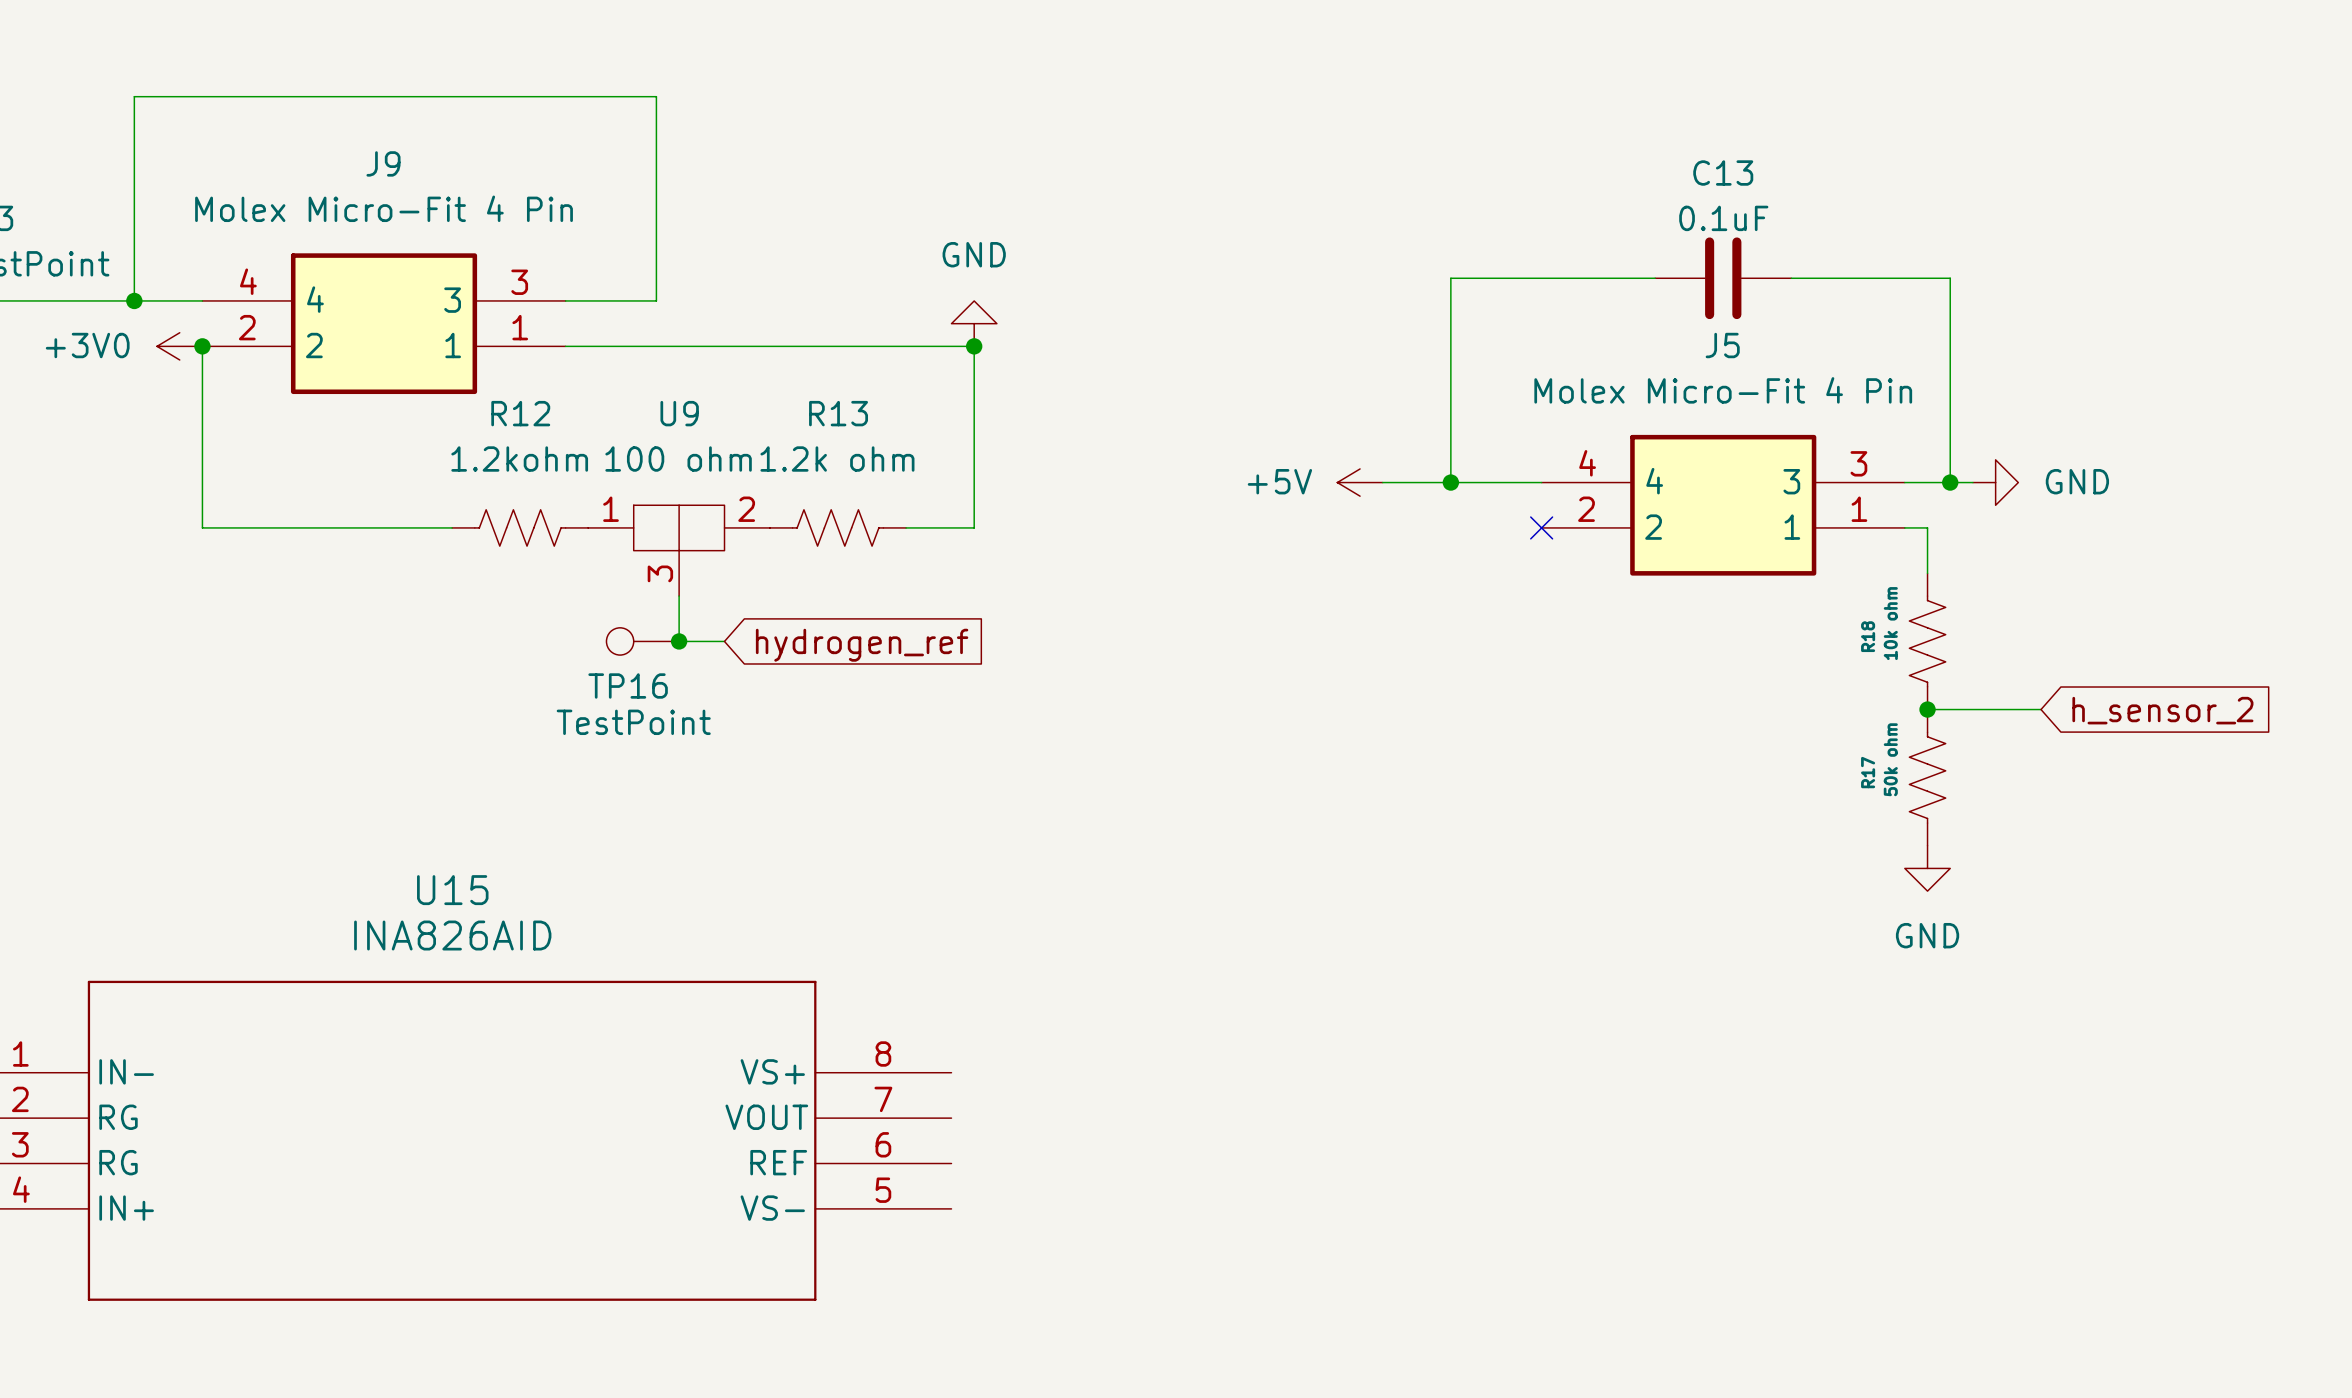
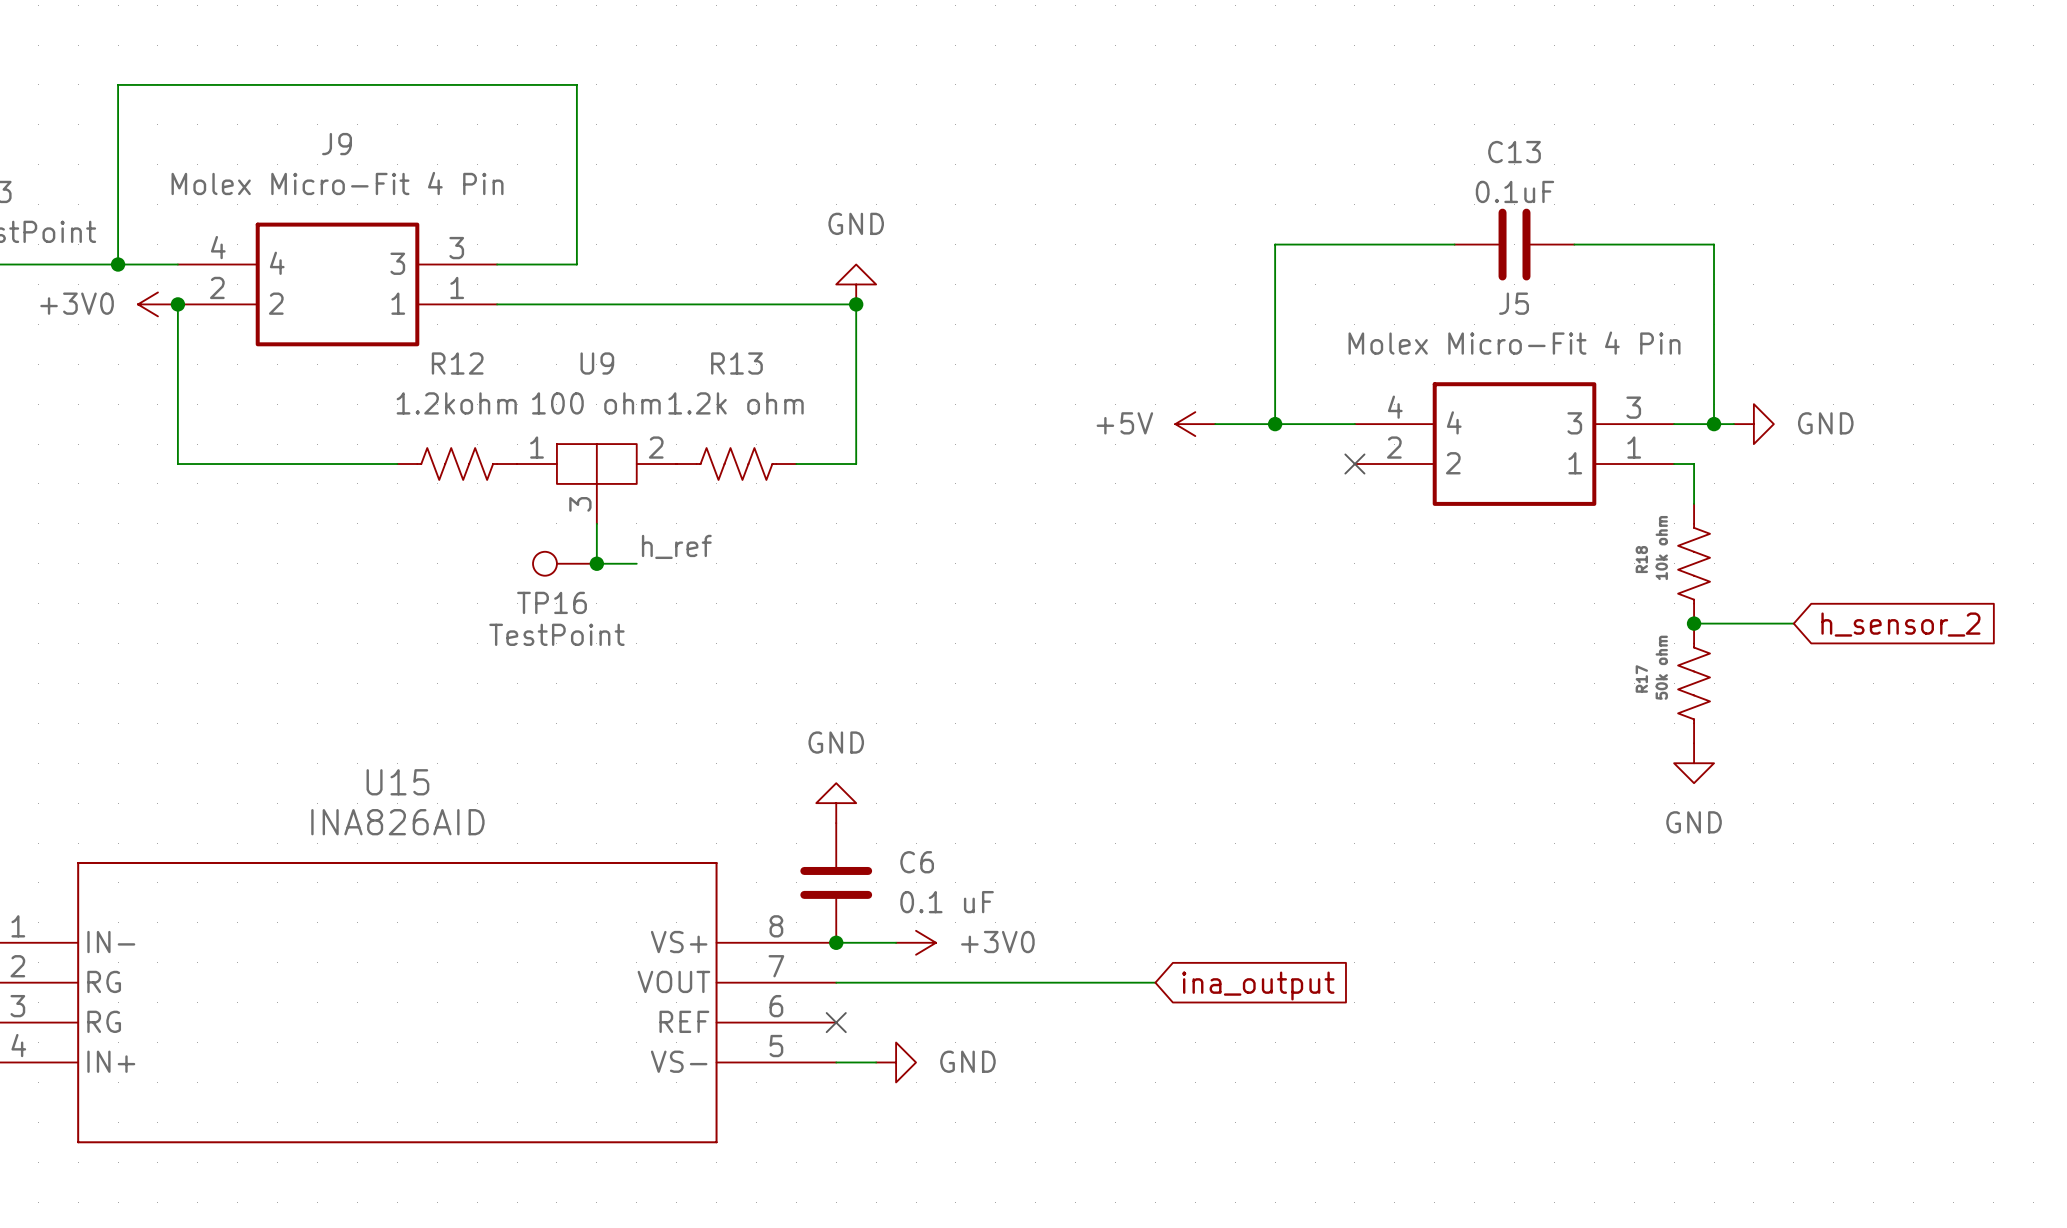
label: none -> h_ref (676, 546)
global label: hydrogen_ref (862, 645) -> none
power symbol: none -> GND (836, 803)
C6: none -> 0.1 uF (836, 882)
wire: none -> (836, 942) (896, 942)
junction: none -> (836, 942)
power symbol: none -> +3V0 (916, 942)
wire: none -> (836, 982) (1155, 982)
global label: none -> ina_output (1258, 986)
no-connect mark: none -> (836, 1022)
wire: none -> (836, 1062) (876, 1062)
power symbol: none -> GND (896, 1062)

